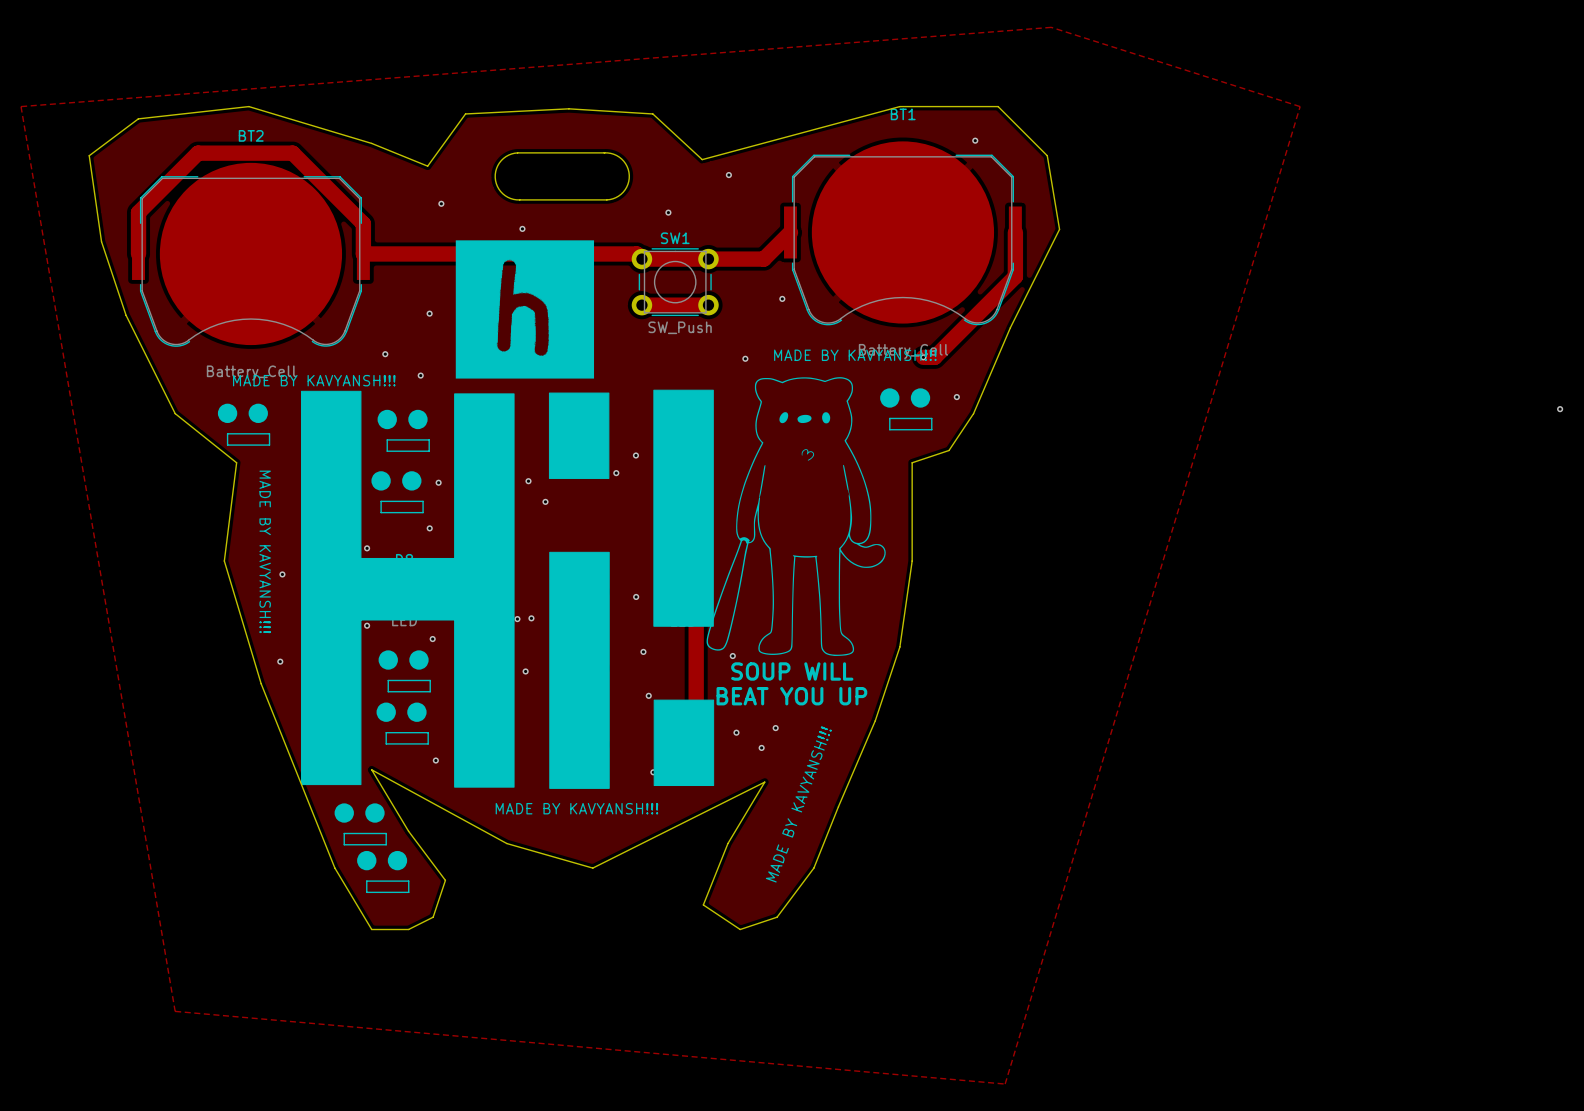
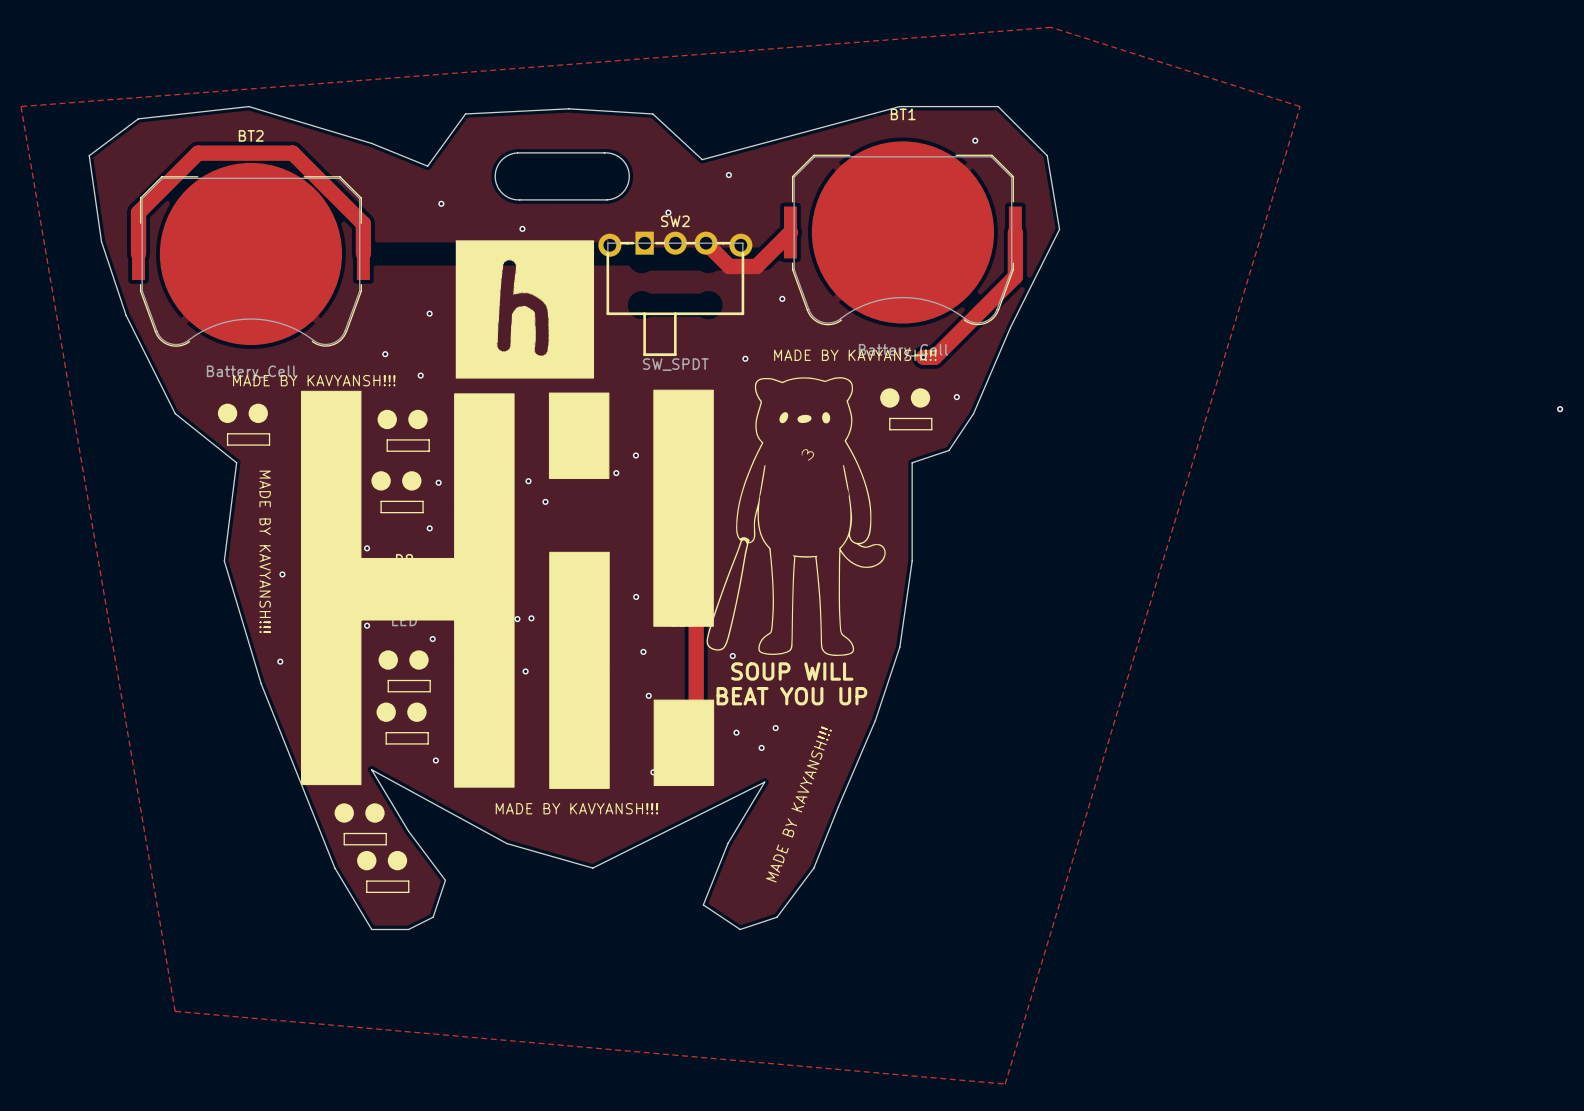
track: (363, 253) (636, 253) (641, 259) (763, 259) -> (706, 243) (729, 266) (756, 266) (763, 259)
SW1: SW_Push (675, 282) -> none
SW2: none -> SW_SPDT (675, 293)
track: (641, 305) (708, 305) -> none

